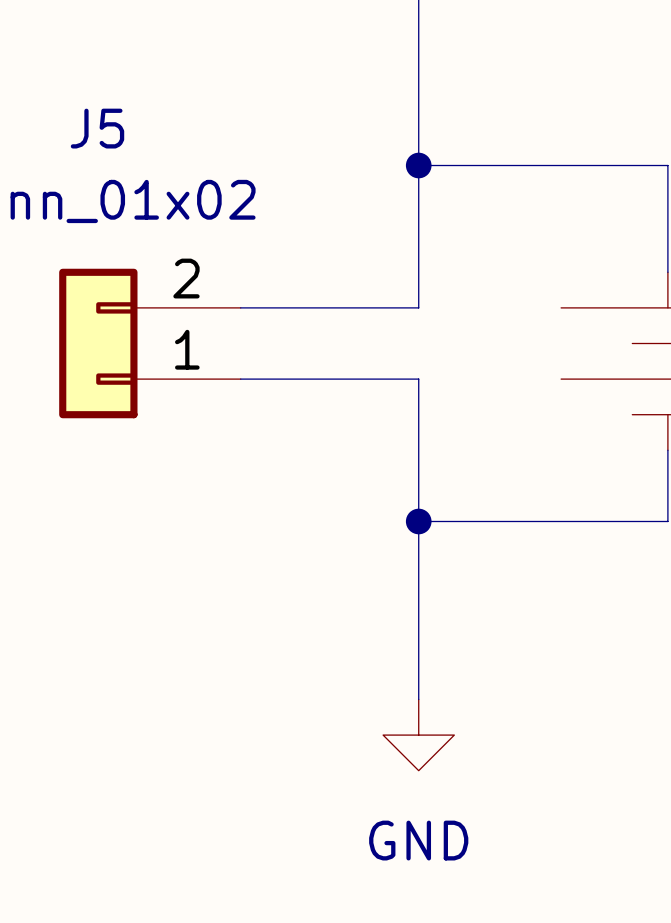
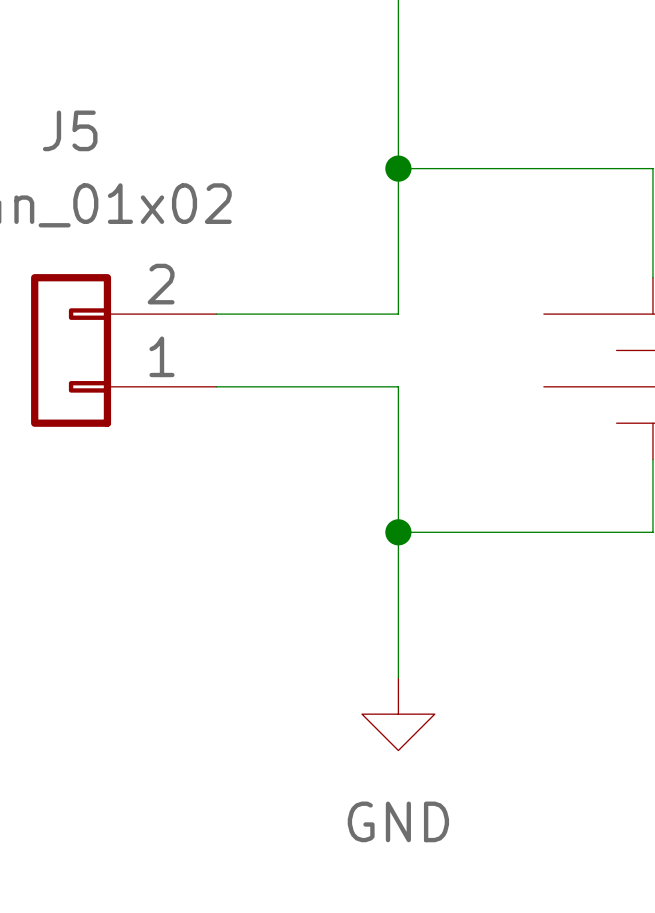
power symbol position: GND (418, 735) -> GND (398, 714)

